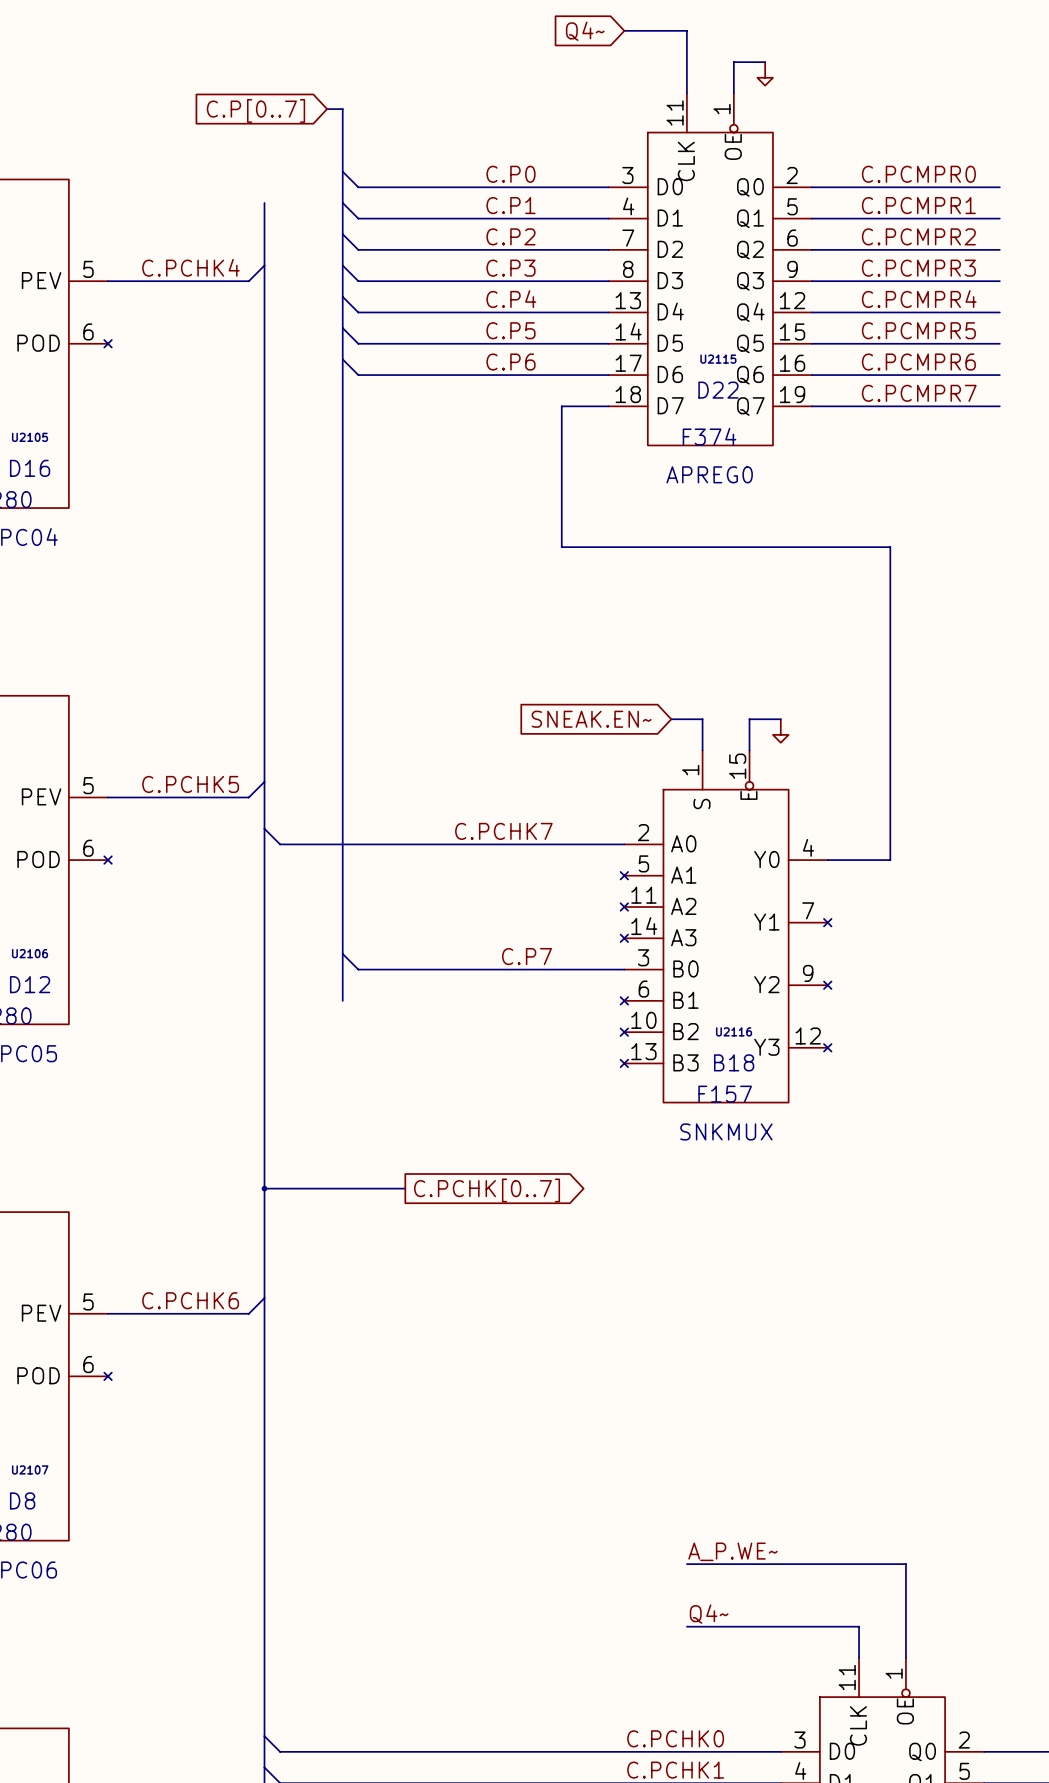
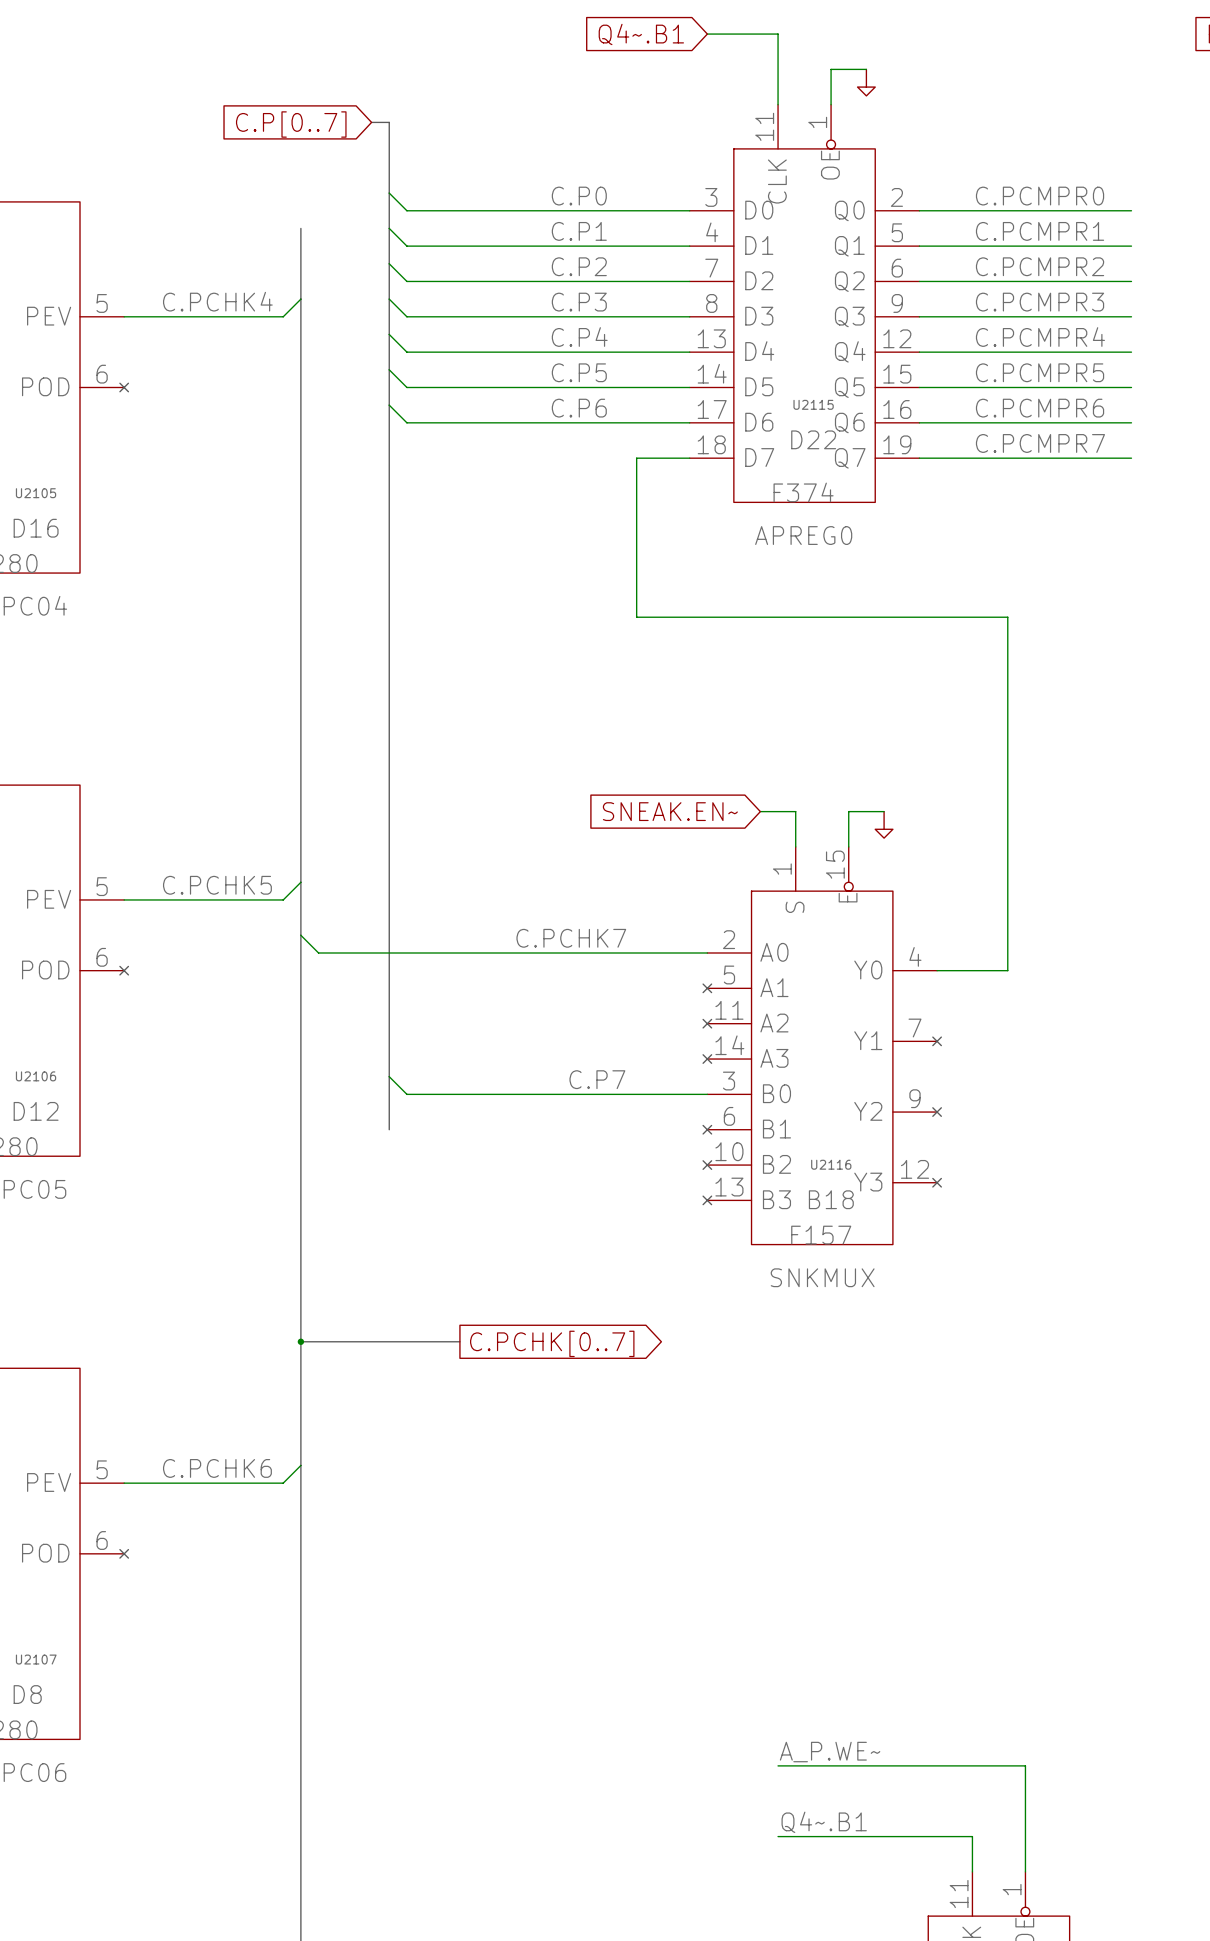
global label: Q4~ (585, 31) -> Q4~.B1 (641, 34)
label: Q4~ (709, 1614) -> Q4~.B1 (824, 1822)

